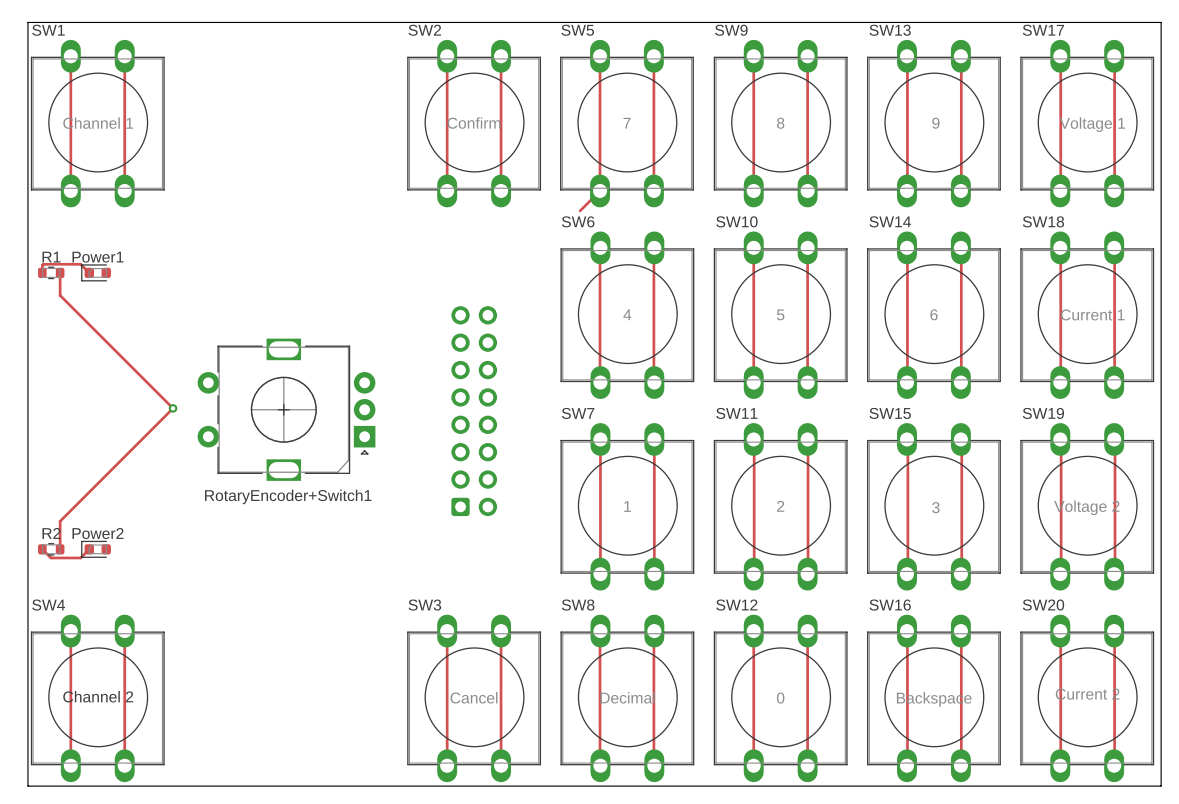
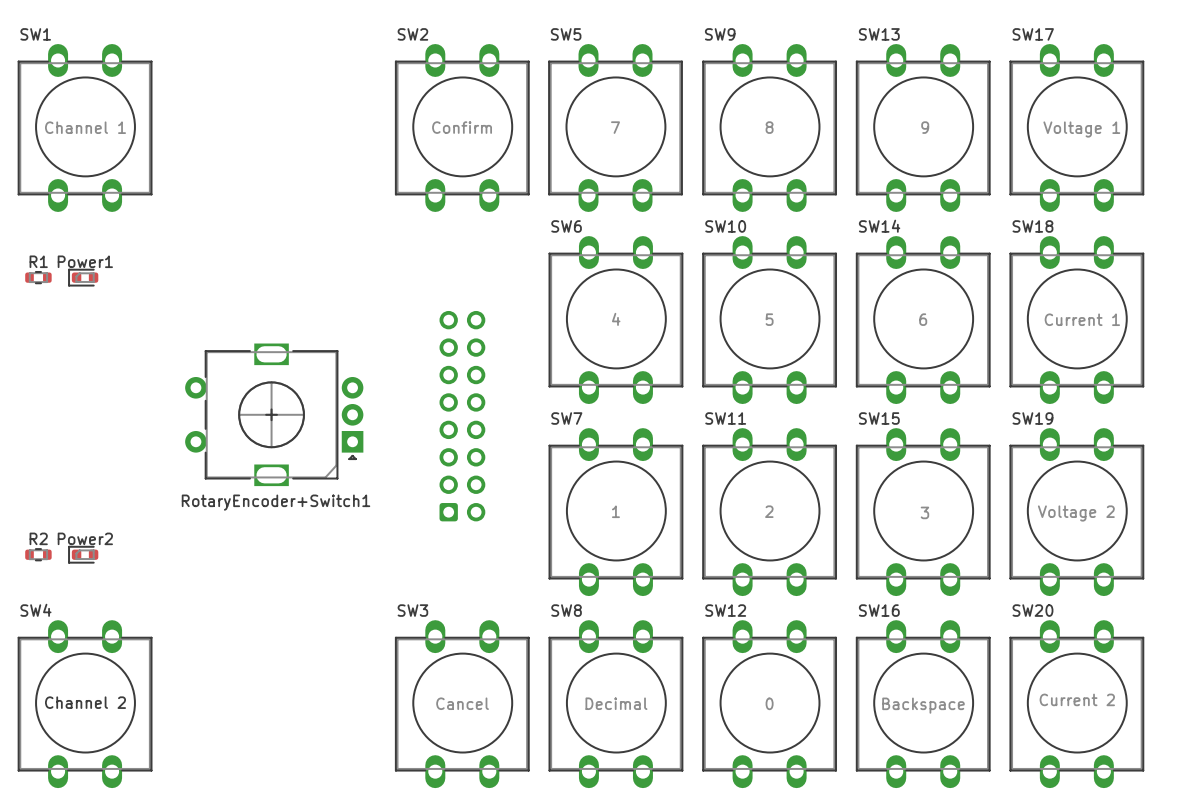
board edge: (27, 22) (1161, 22) (1161, 786) (27, 786) (27, 22) -> none
track: (70, 56) (70, 190) -> none
track: (124, 56) (124, 190) -> none
track: (907, 60) (907, 194) -> none
track: (961, 60) (961, 194) -> none
track: (1060, 60) (1060, 194) -> none
track: (1114, 60) (1114, 194) -> none
track: (447, 61) (447, 196) -> none
track: (501, 61) (501, 196) -> none
track: (600, 61) (600, 196) -> none
track: (653, 61) (653, 196) -> none
track: (753, 61) (753, 196) -> none
track: (807, 61) (807, 196) -> none
track: (600, 190) (580, 210) -> none
track: (907, 246) (907, 380) -> none
track: (961, 246) (961, 380) -> none
track: (1060, 246) (1060, 380) -> none
track: (1114, 246) (1114, 380) -> none
track: (600, 247) (600, 382) -> none
track: (653, 247) (653, 382) -> none
track: (753, 247) (753, 382) -> none
track: (807, 247) (807, 382) -> none
track: (42, 272) (43, 264) (80, 264) (89, 272) -> none
track: (60, 272) (60, 295) (173, 408) (60, 521) (60, 549) -> none
via: (173, 408) -> none
track: (907, 439) (907, 573) -> none
track: (961, 439) (961, 573) -> none
track: (1061, 439) (1061, 573) -> none
track: (1115, 439) (1115, 573) -> none
track: (600, 440) (600, 575) -> none
track: (654, 440) (654, 575) -> none
track: (754, 440) (754, 575) -> none
track: (808, 440) (808, 575) -> none
track: (42, 549) (50, 557) (80, 557) (89, 549) -> none
track: (70, 631) (70, 765) -> none
track: (124, 631) (124, 765) -> none
track: (907, 632) (907, 766) -> none
track: (961, 632) (961, 766) -> none
track: (1060, 632) (1060, 766) -> none
track: (1114, 632) (1114, 766) -> none
track: (447, 633) (447, 768) -> none
track: (501, 633) (501, 768) -> none
track: (600, 633) (600, 768) -> none
track: (653, 633) (653, 768) -> none
track: (753, 633) (753, 768) -> none
track: (807, 633) (807, 768) -> none

